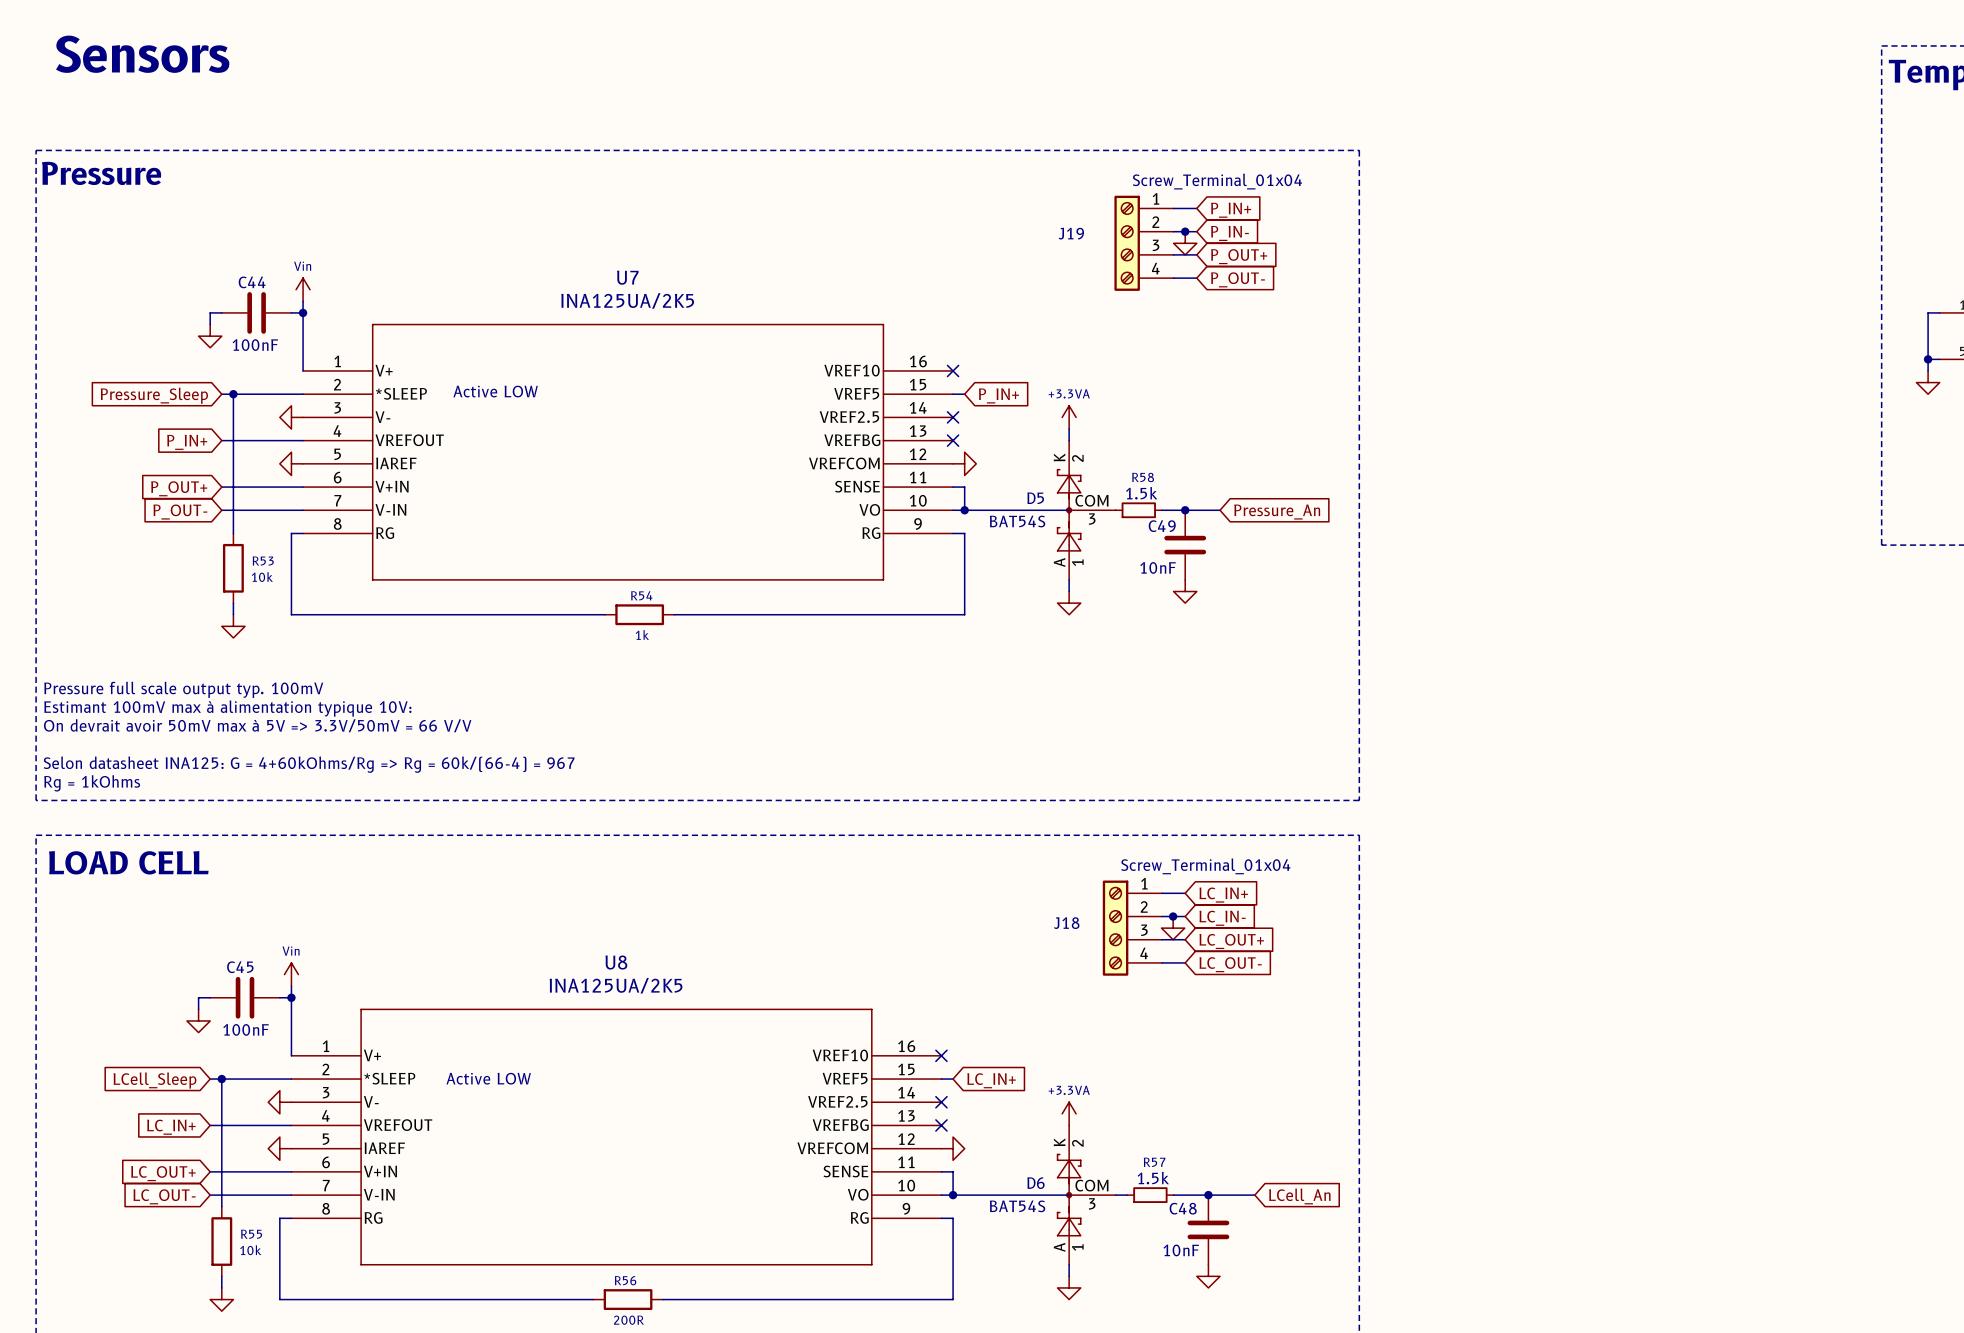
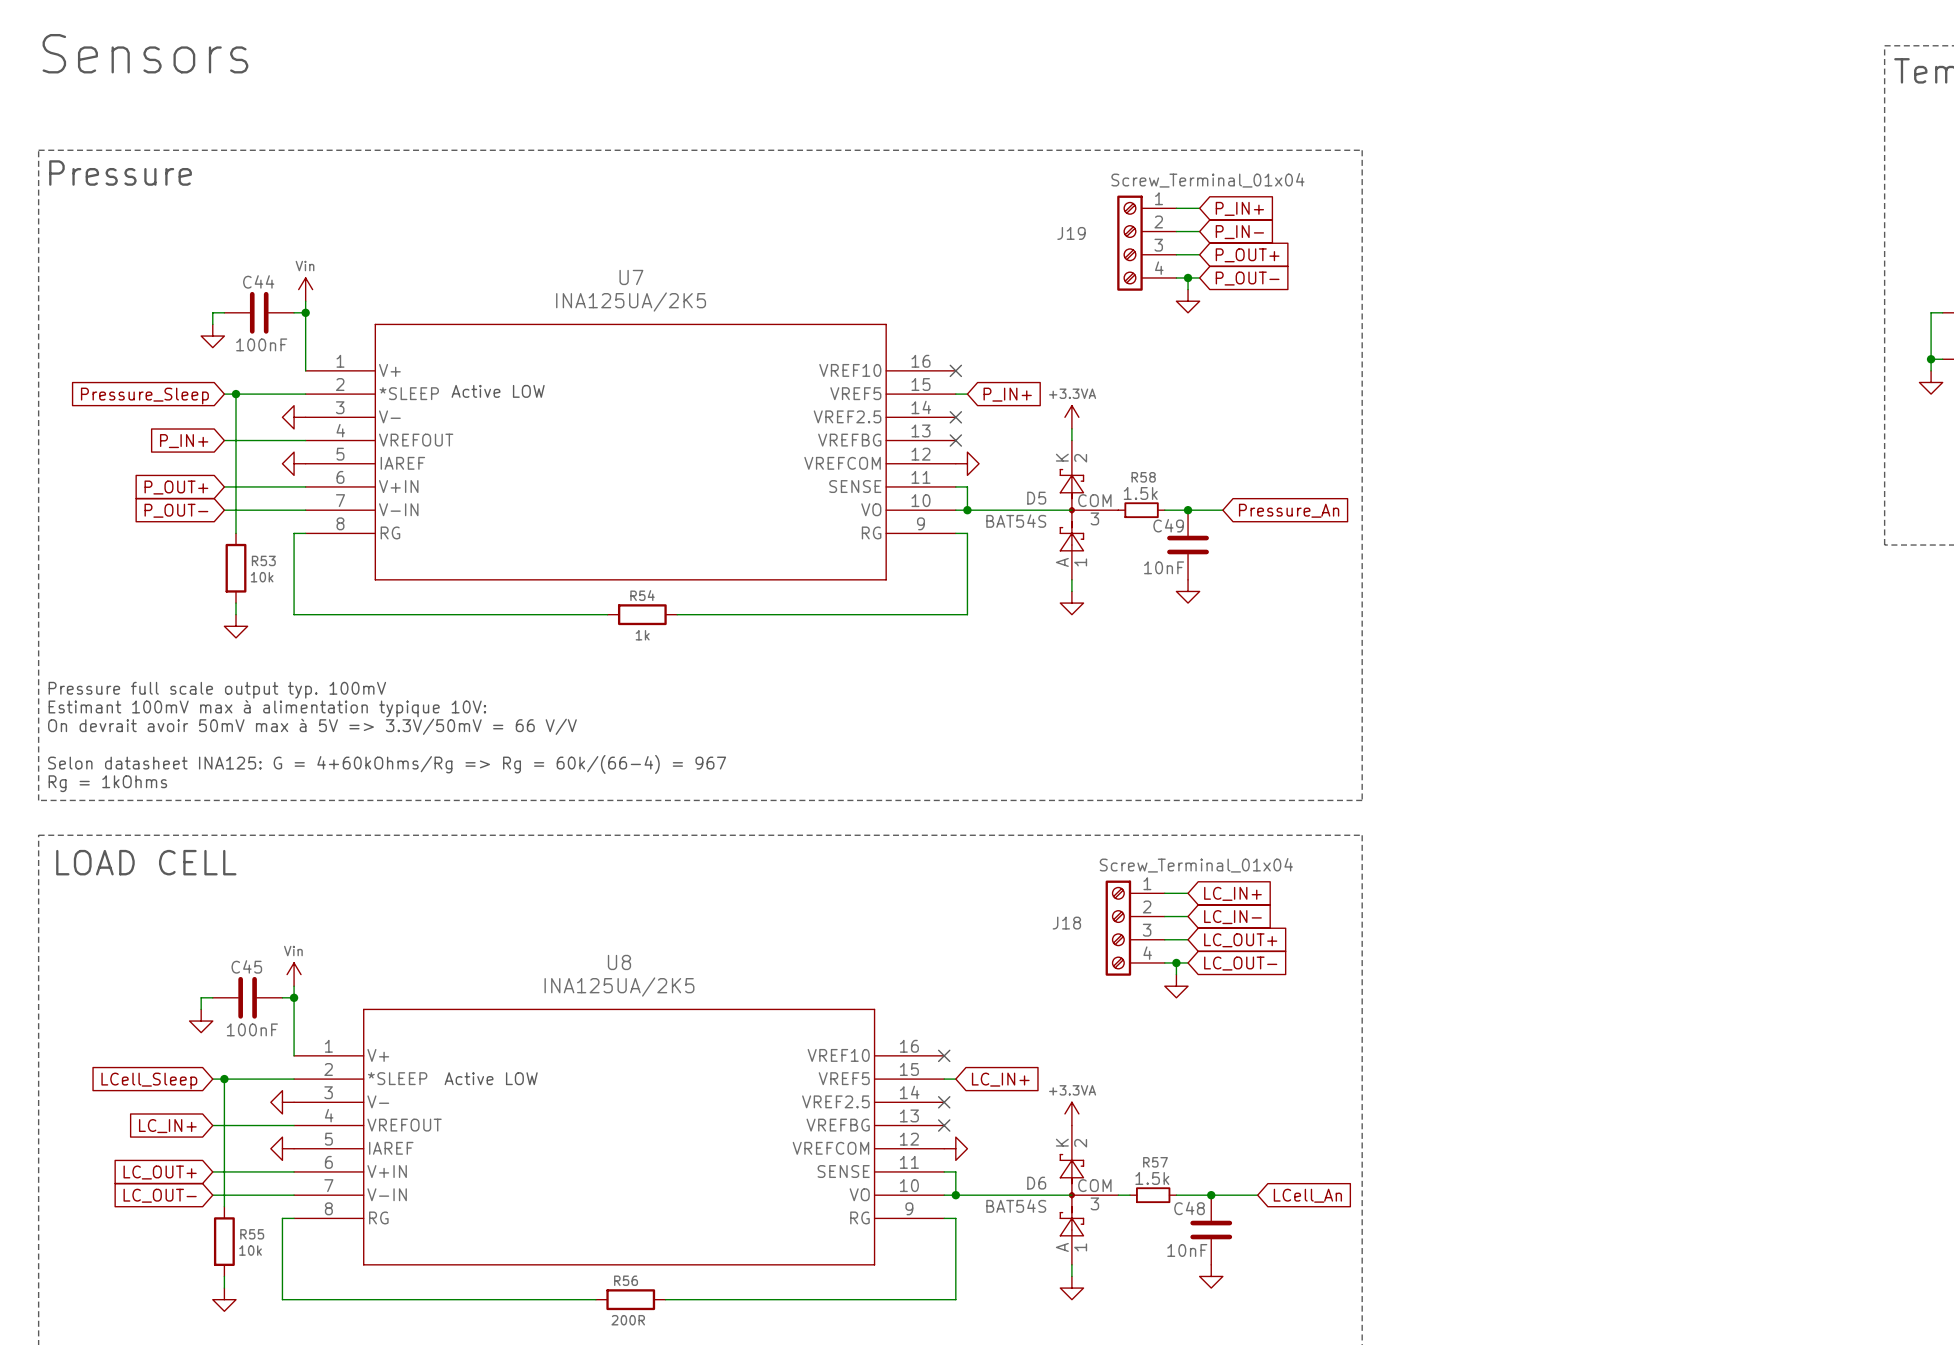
junction position: (1185, 231) -> (1188, 277)
power symbol position: (1185, 243) -> (1188, 301)
wire: none -> (1188, 277) (1188, 289)
junction position: (1173, 916) -> (1176, 962)
power symbol position: (1173, 928) -> (1176, 986)
wire: none -> (1176, 962) (1176, 974)

